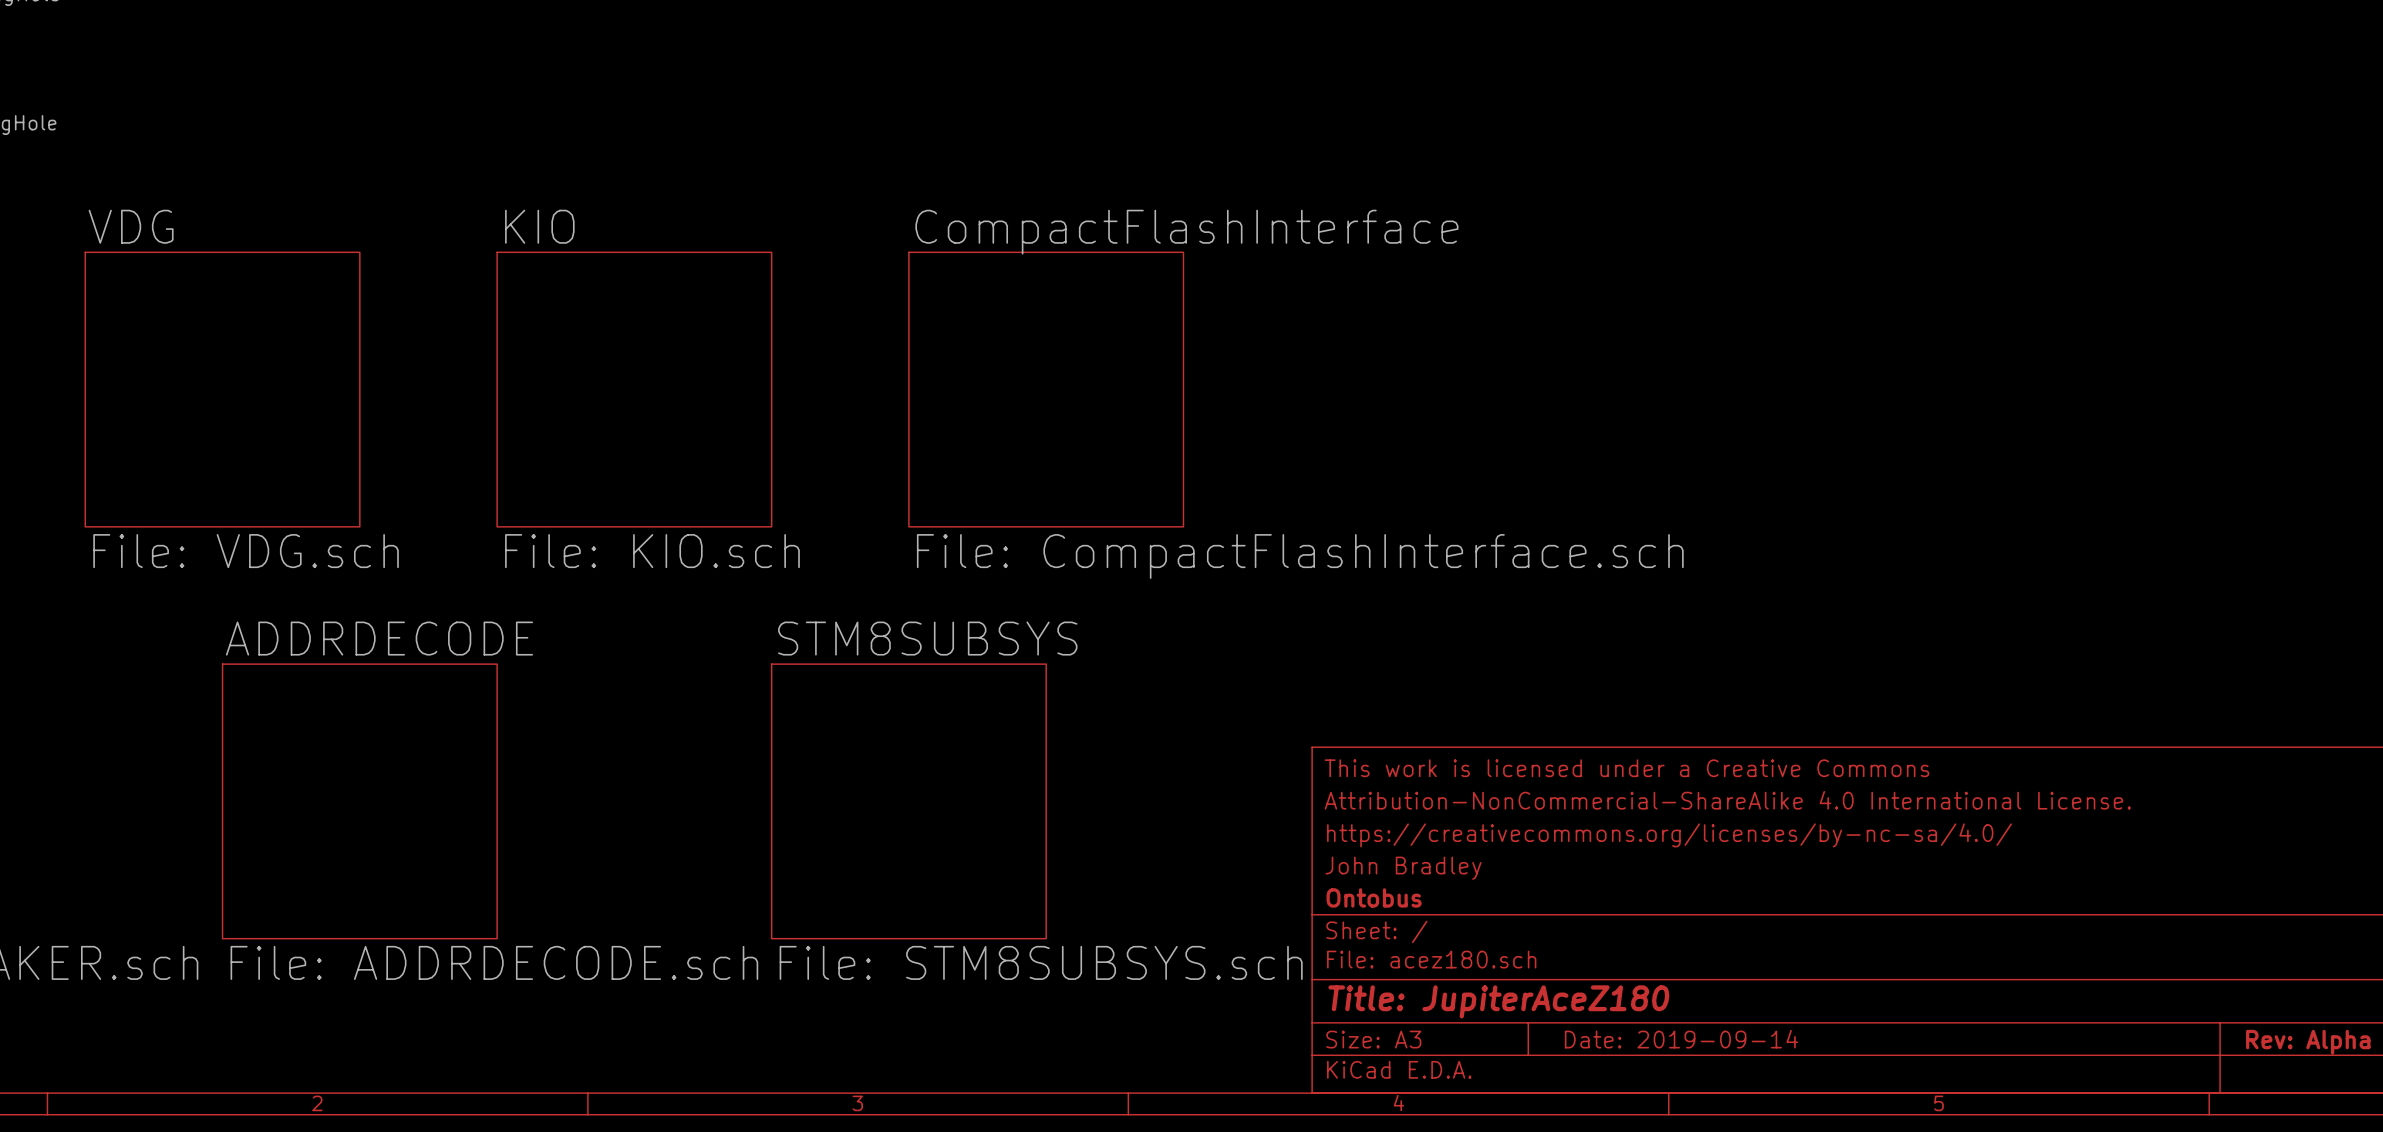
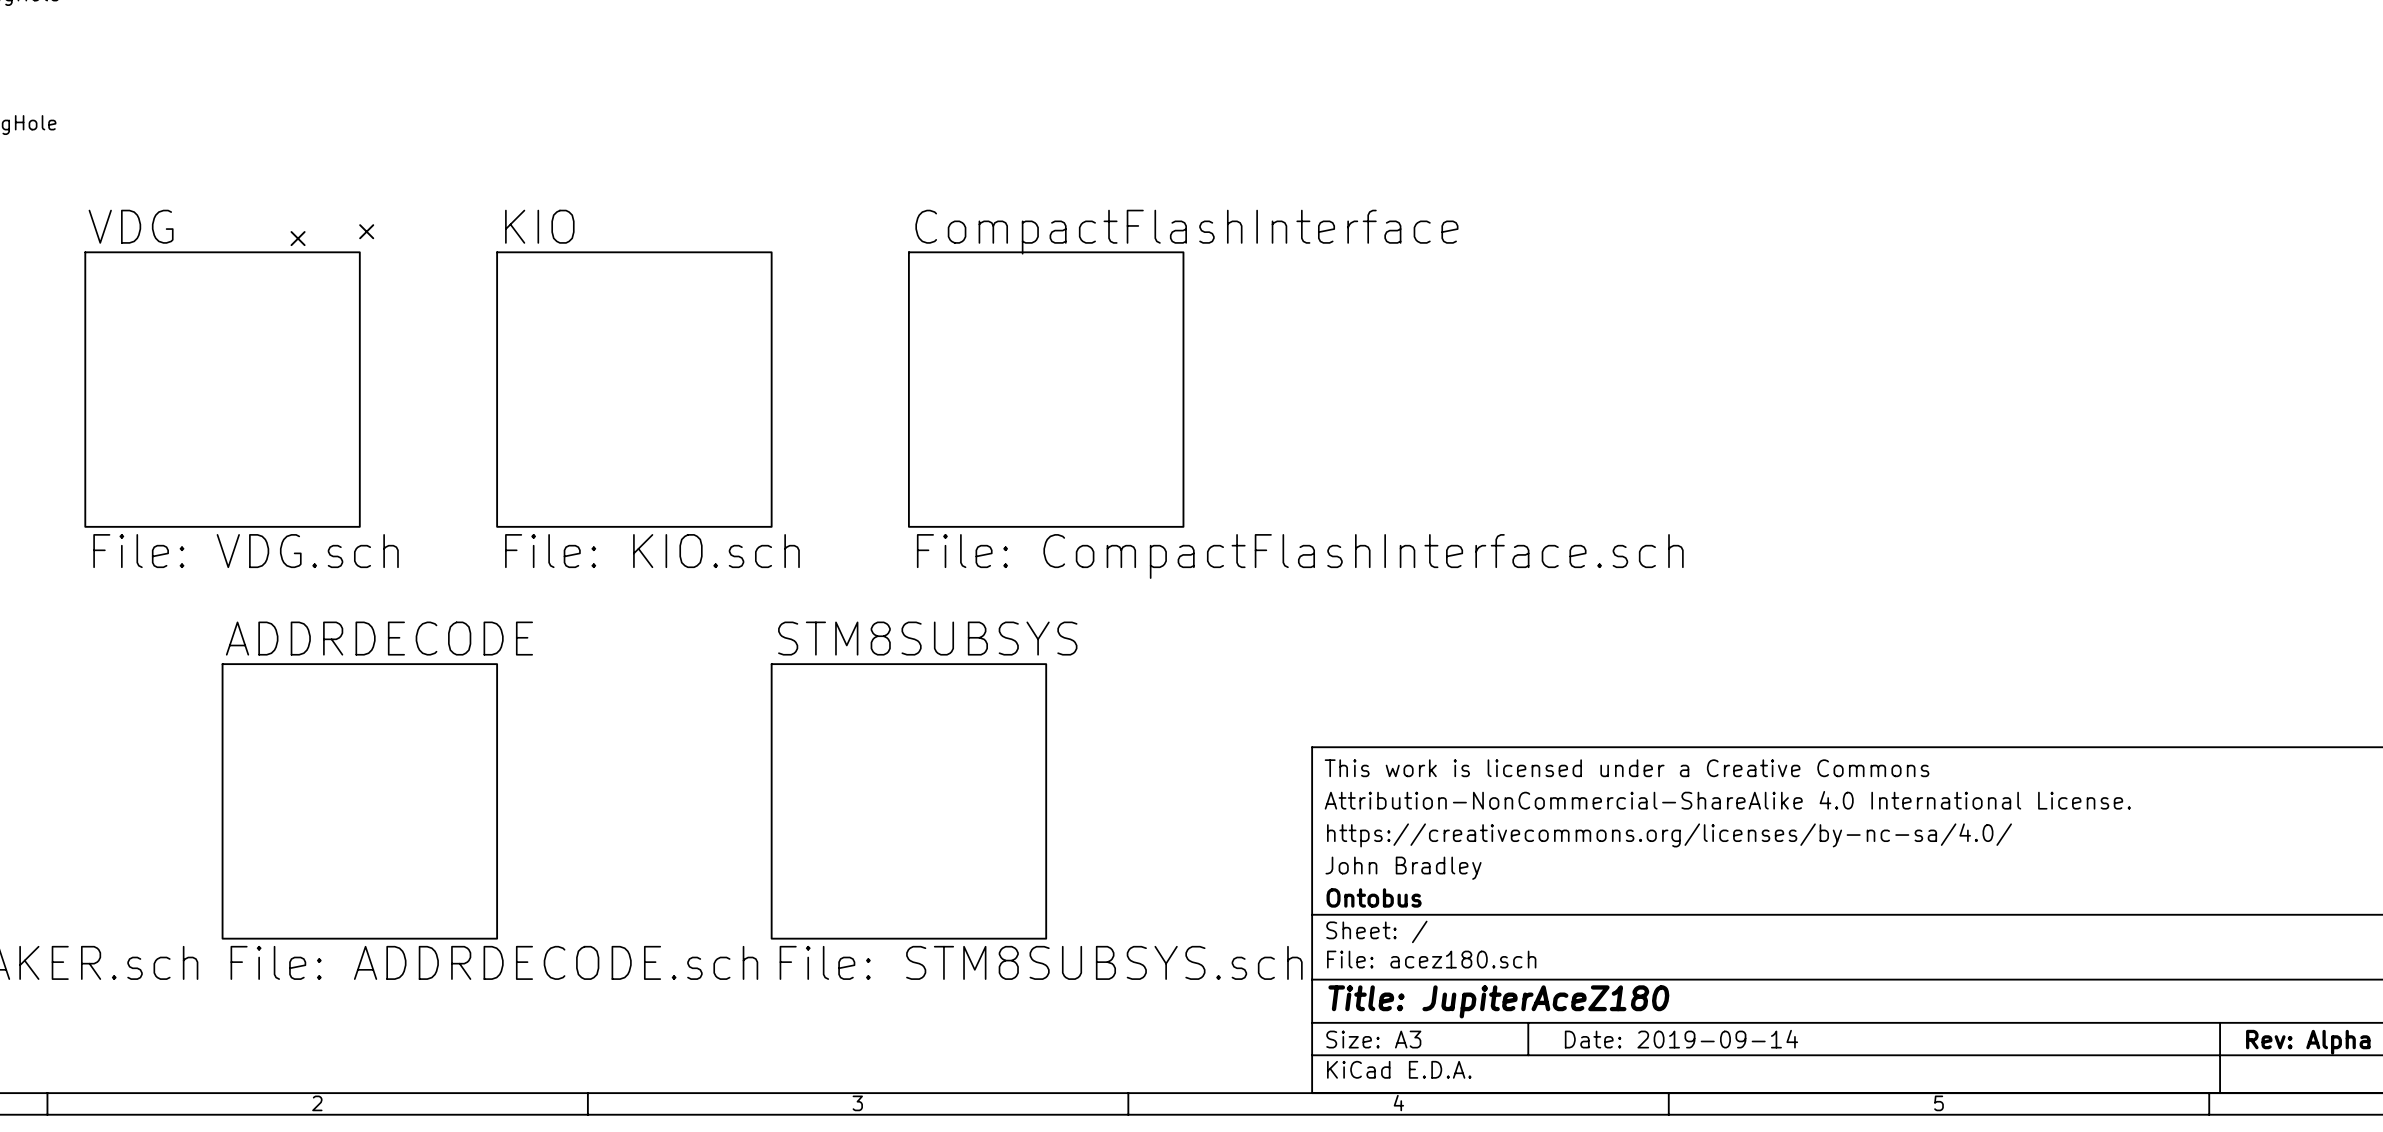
no-connect mark: none -> (366, 231)
no-connect mark: none -> (298, 238)

